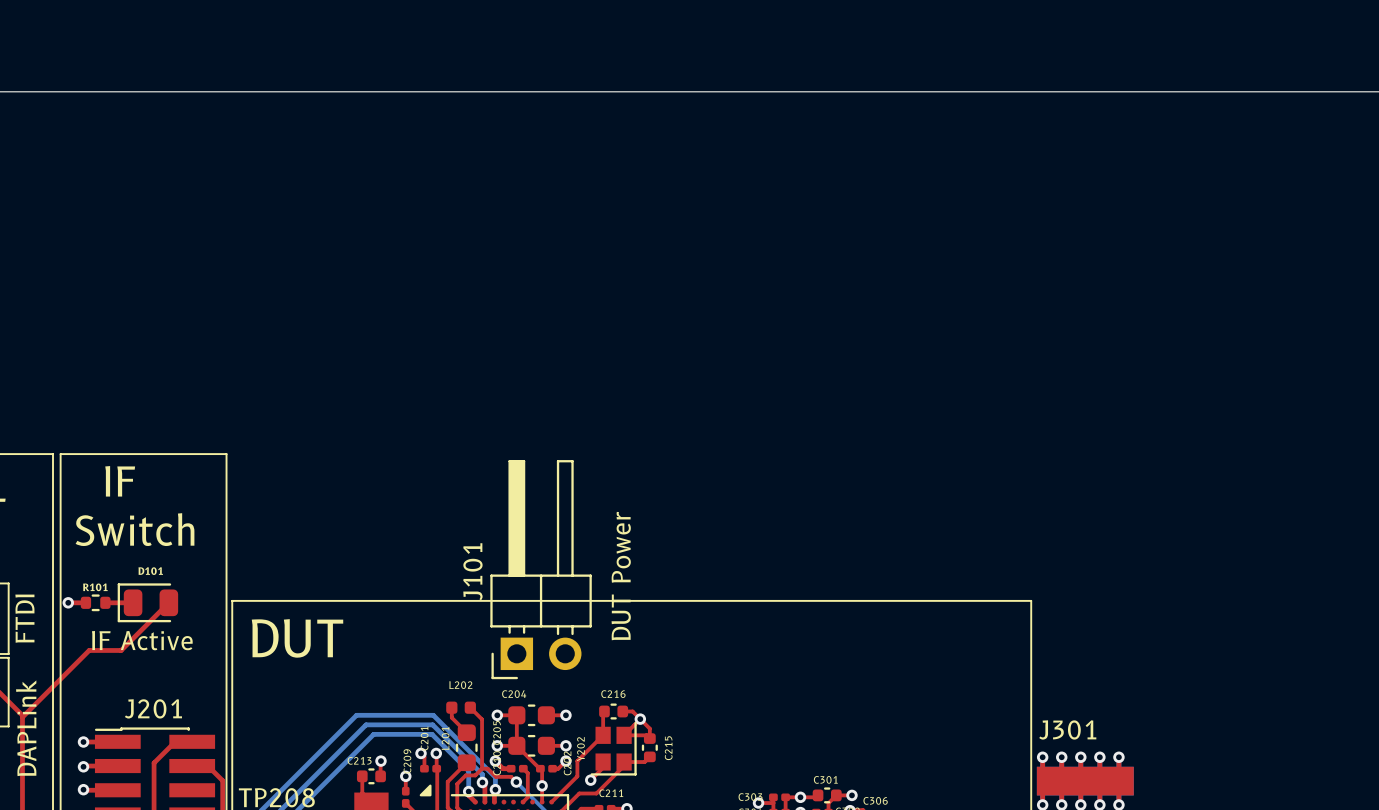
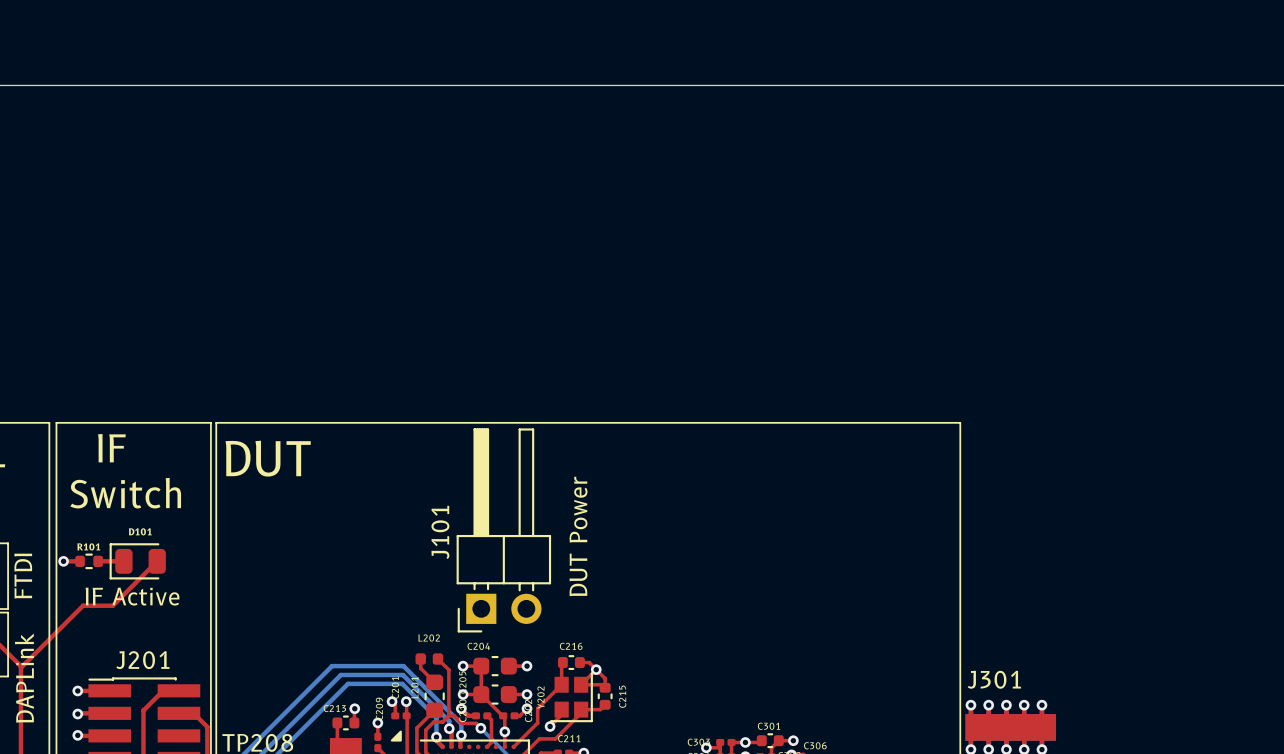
line: (232, 600) (1031, 600) -> (216, 559) (216, 422) (960, 422) (960, 559)
text position: DUT (297, 638) -> DUT (268, 458)

